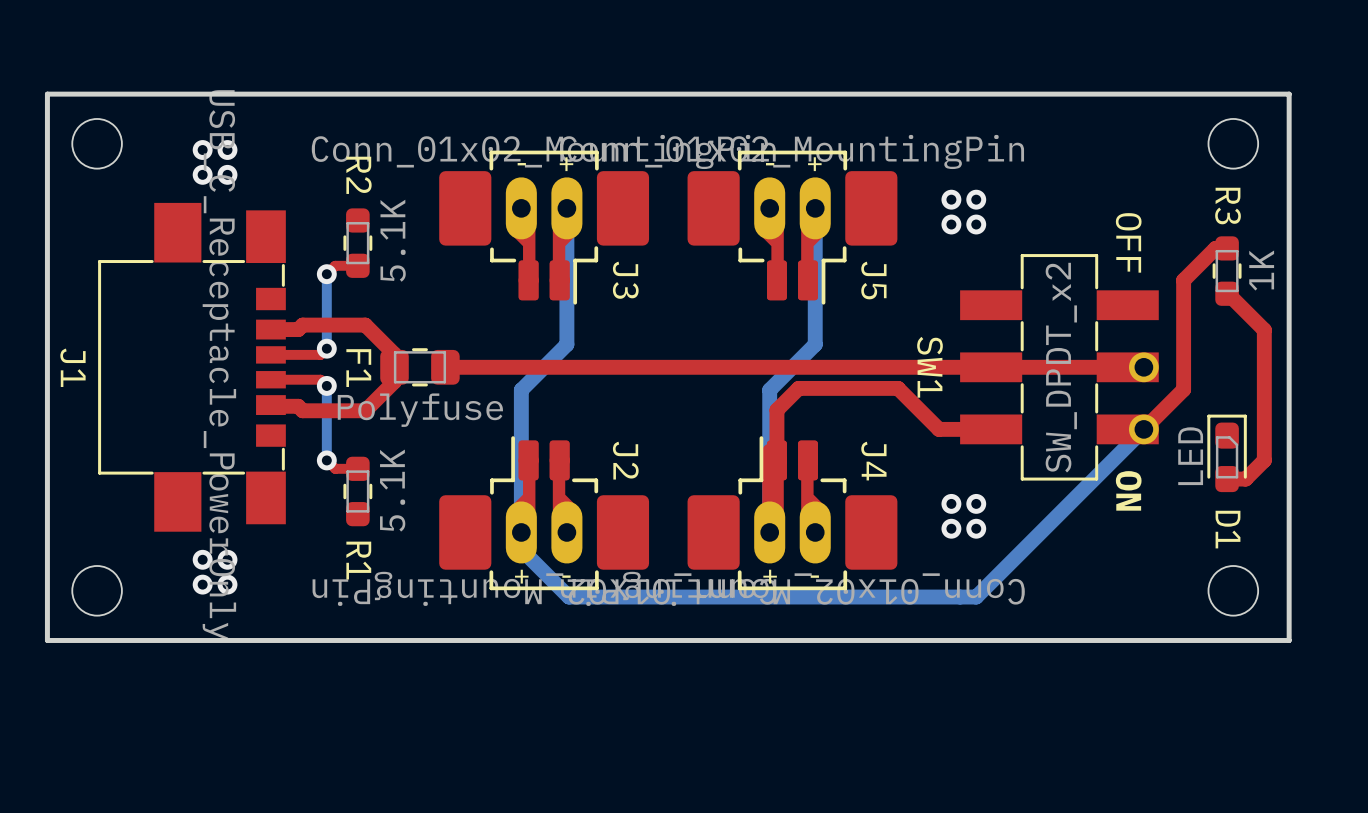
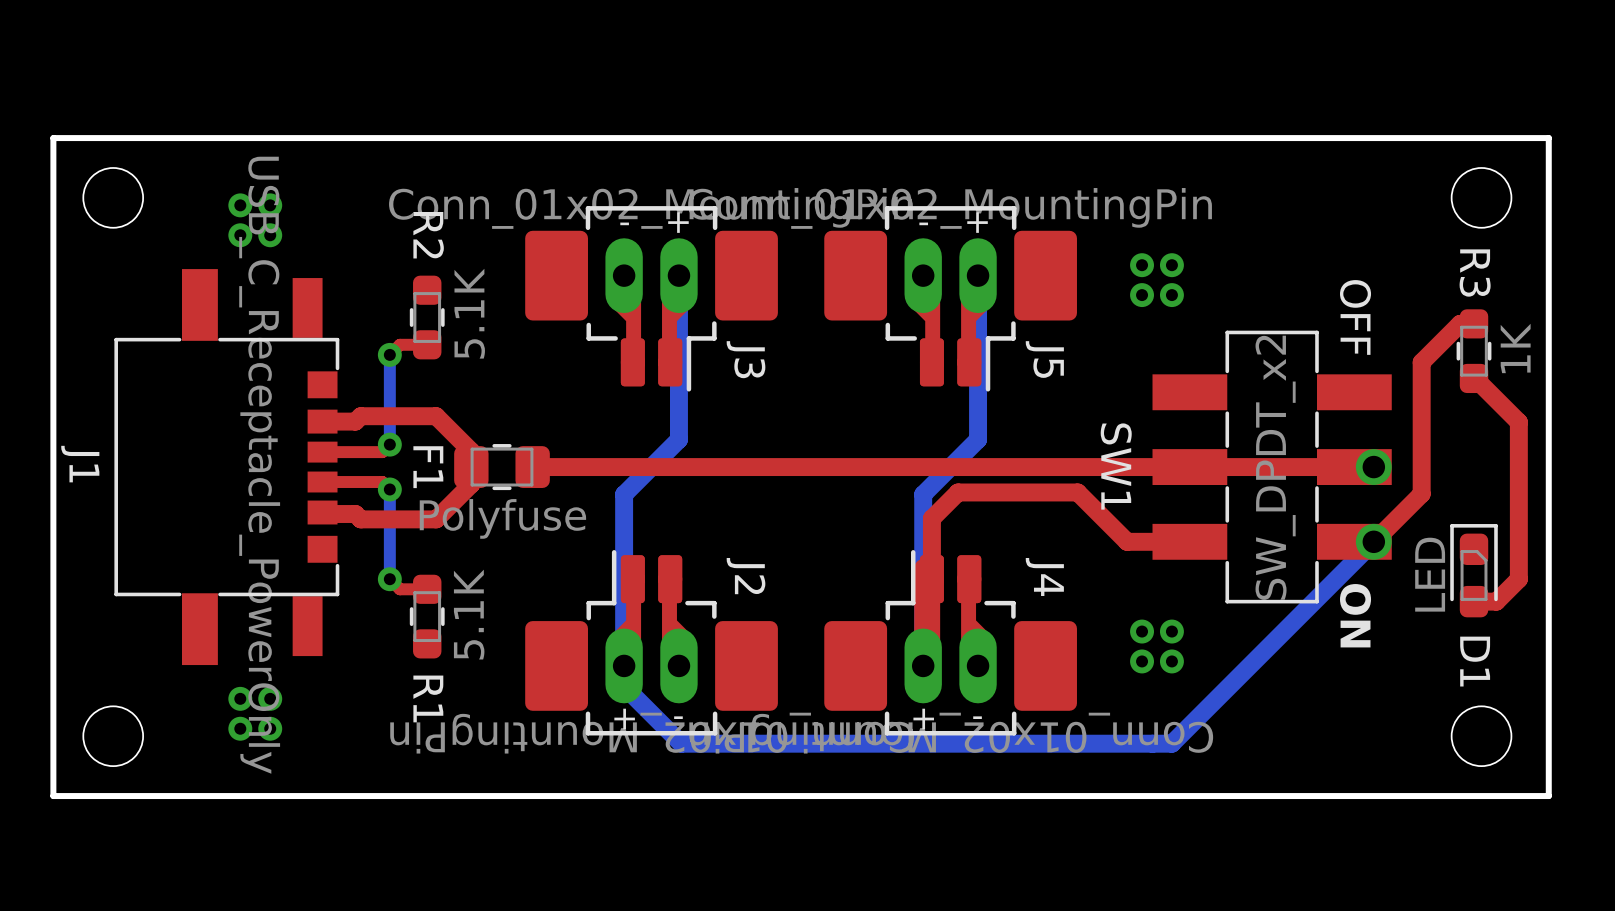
J1 footprint: [98, 202, 286, 532] -> [114, 269, 340, 666]

